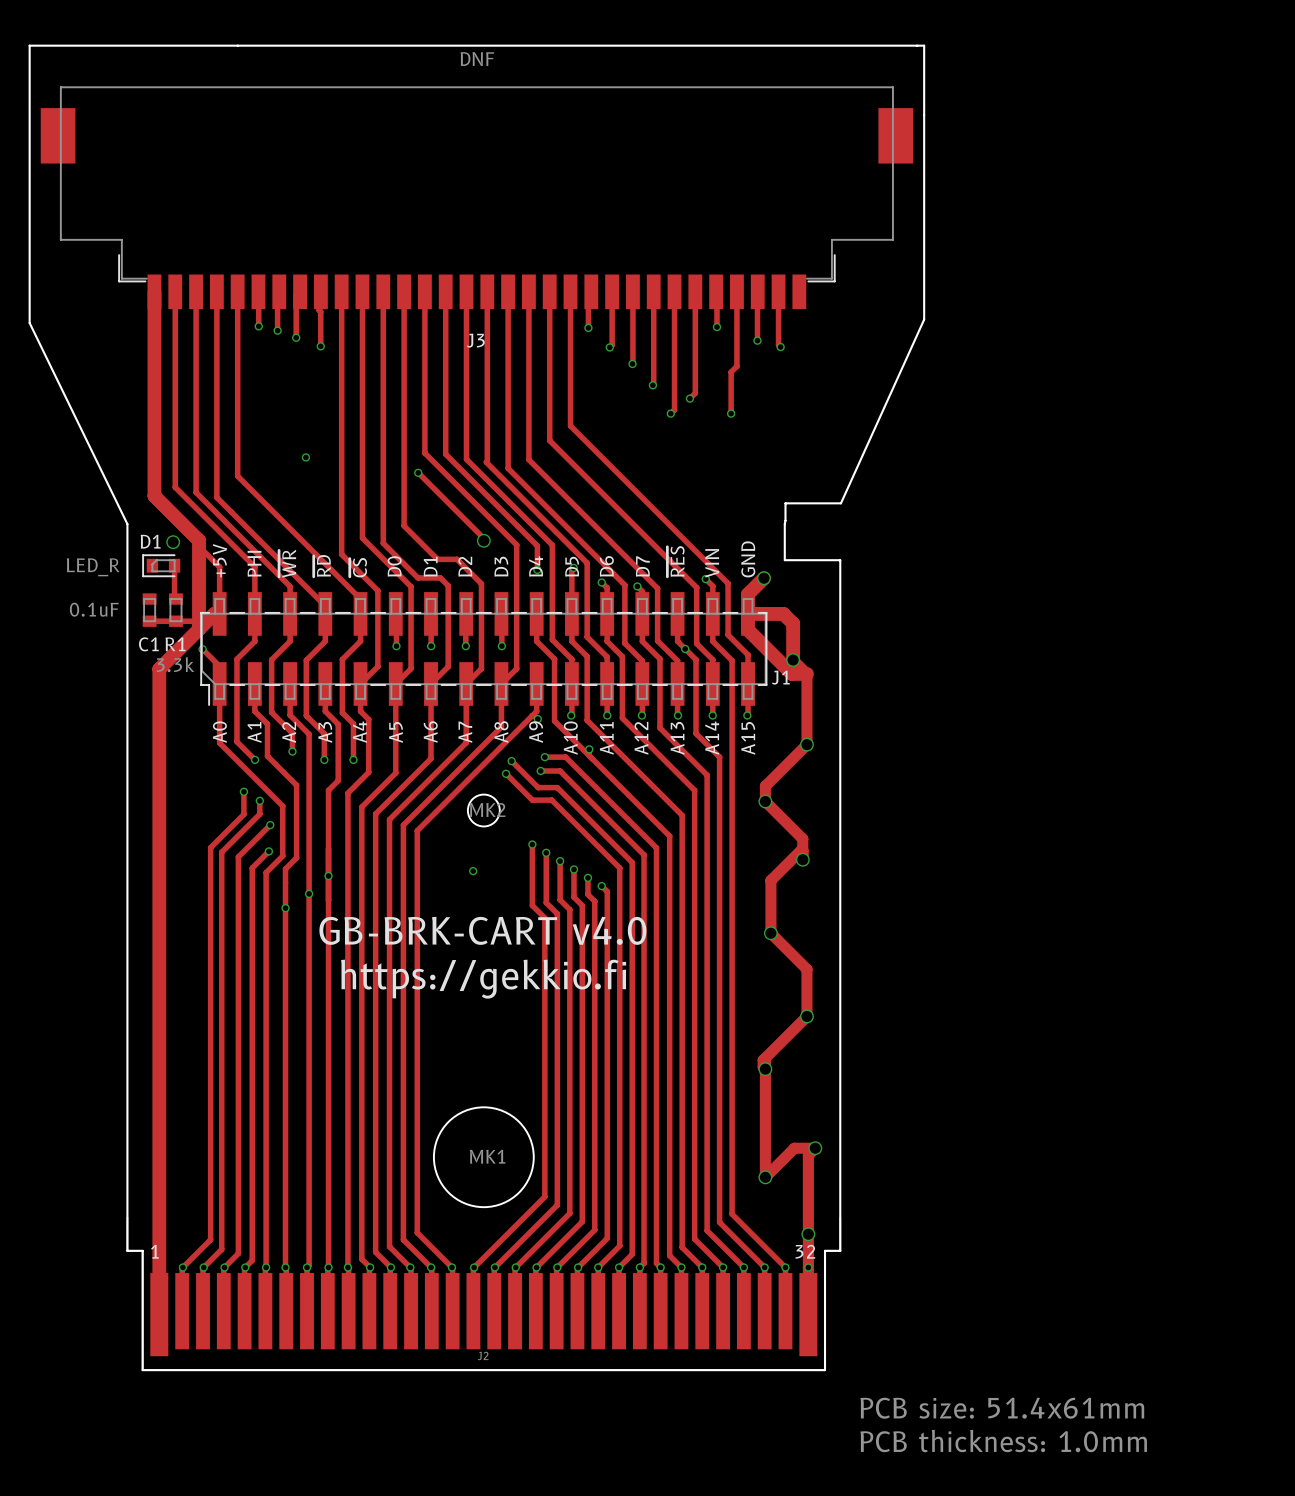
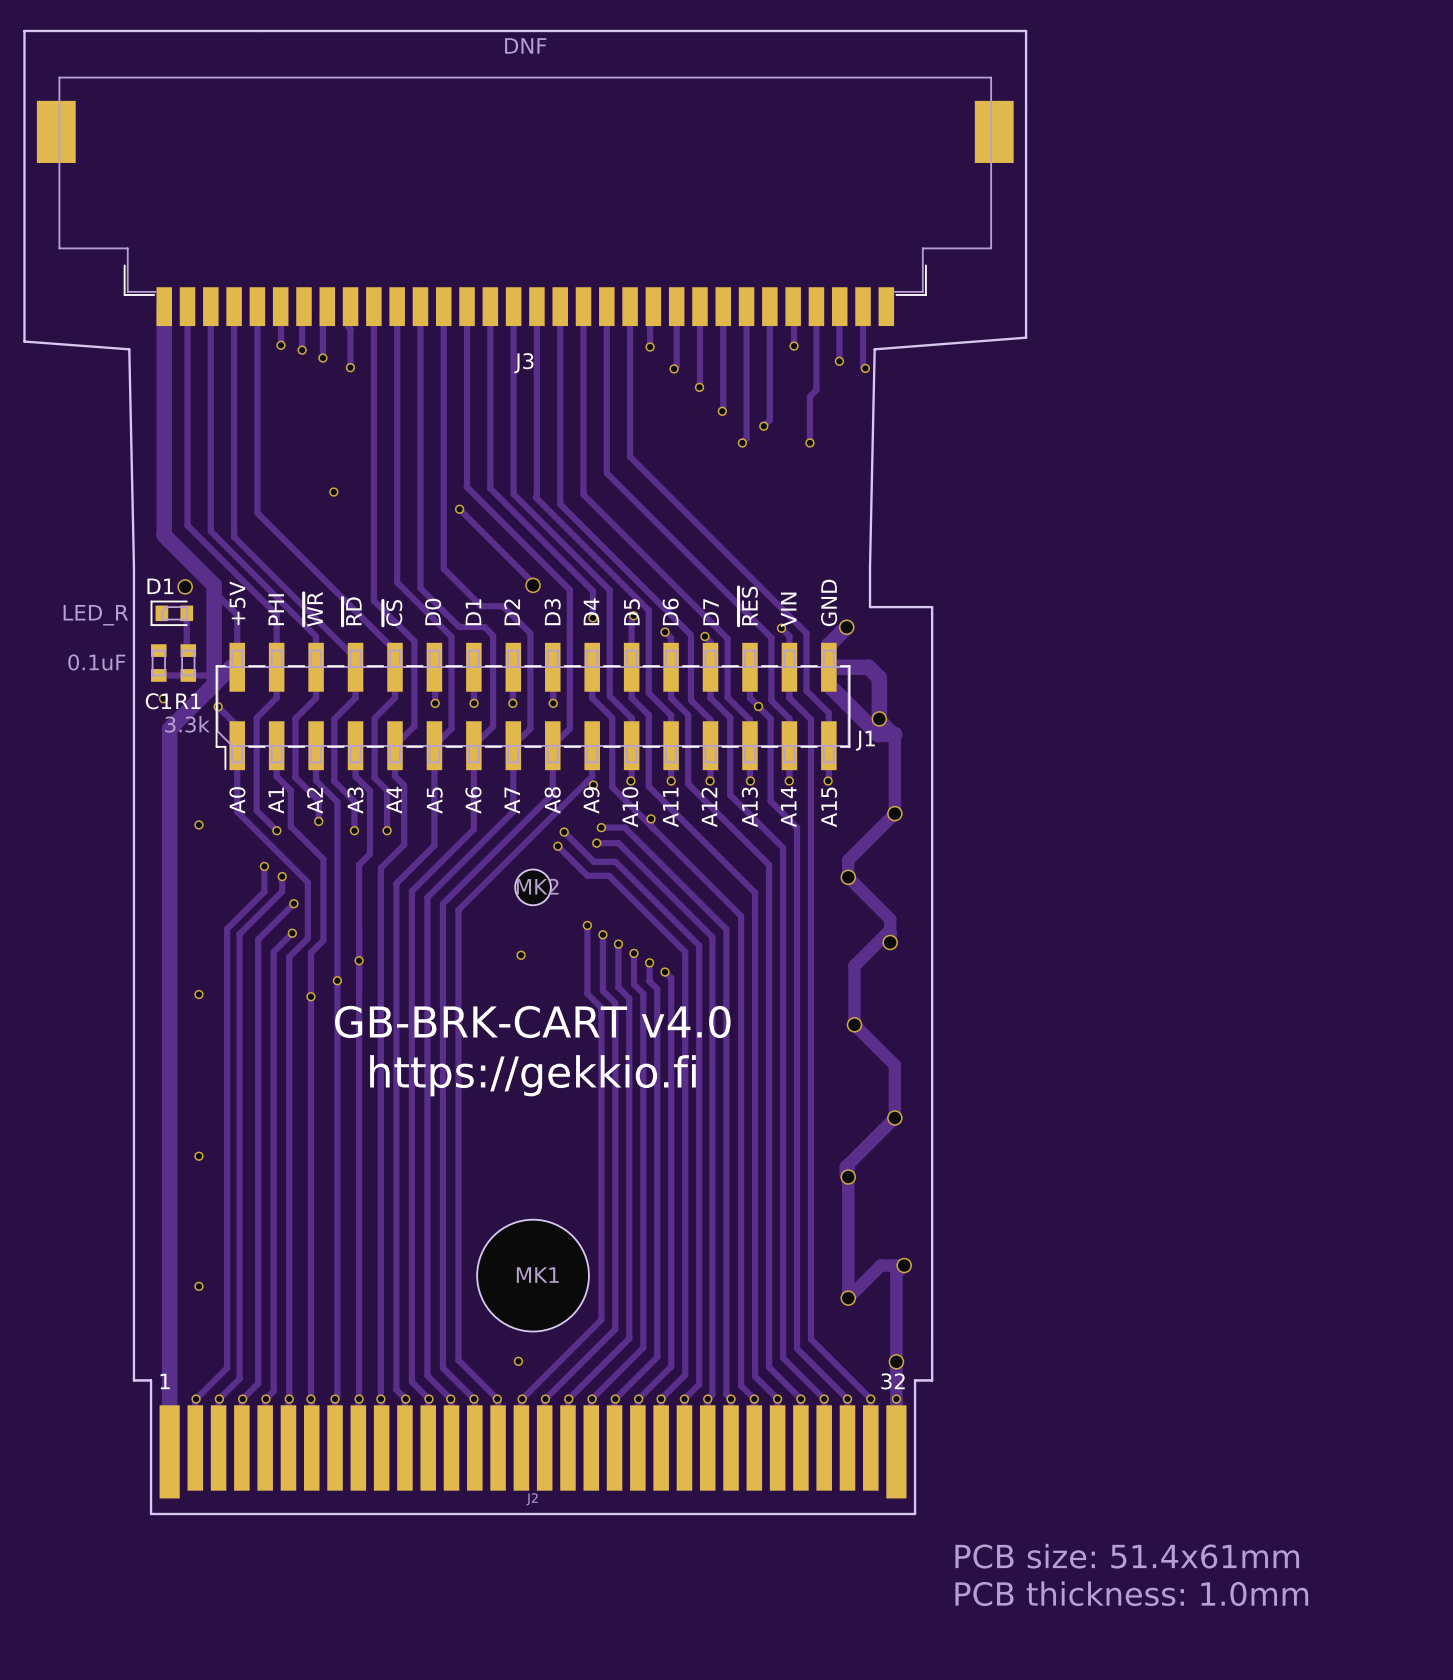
board edge: (924, 319) (840, 503) (785, 503) (784, 524) -> (1026, 337) (874, 349) (870, 566)
board edge: (29, 323) (127, 524) -> (24, 341) (129, 349) (133, 566)
via: none -> (163, 698)
via: none -> (198, 824)
via: none -> (198, 994)
via: none -> (198, 1156)
via: none -> (198, 1286)
via: none -> (518, 1361)

